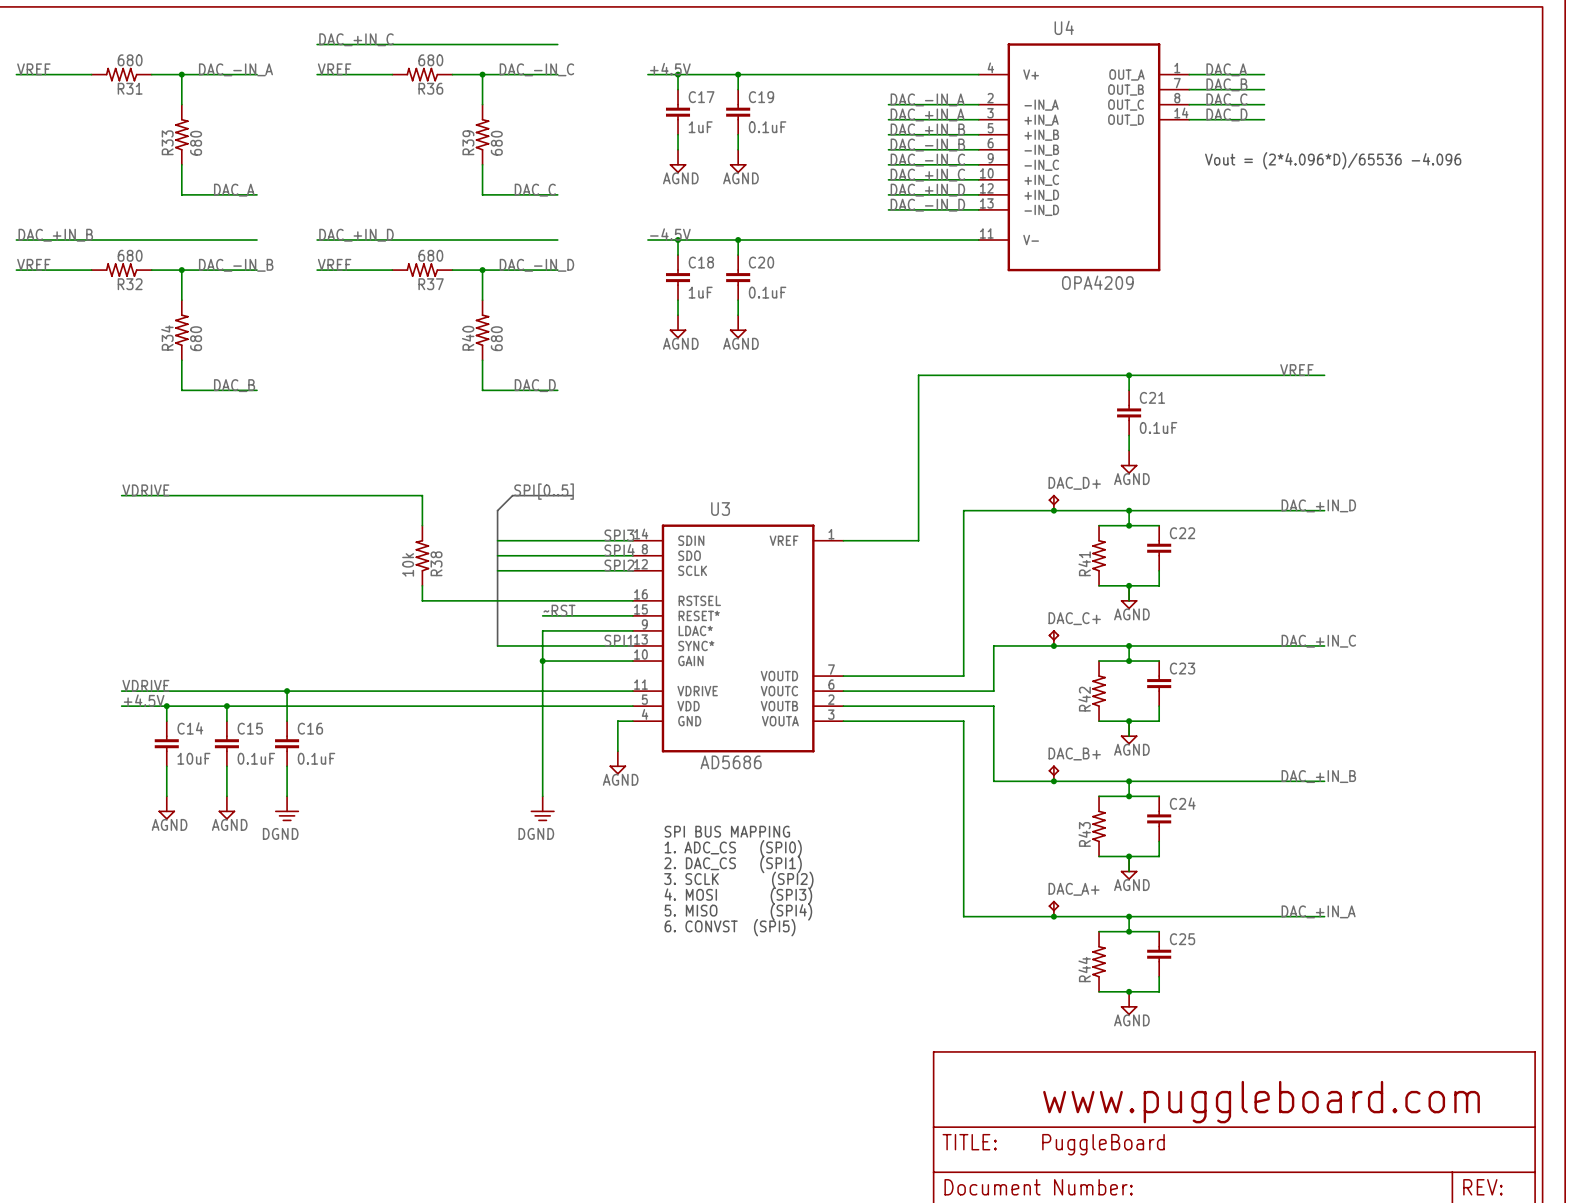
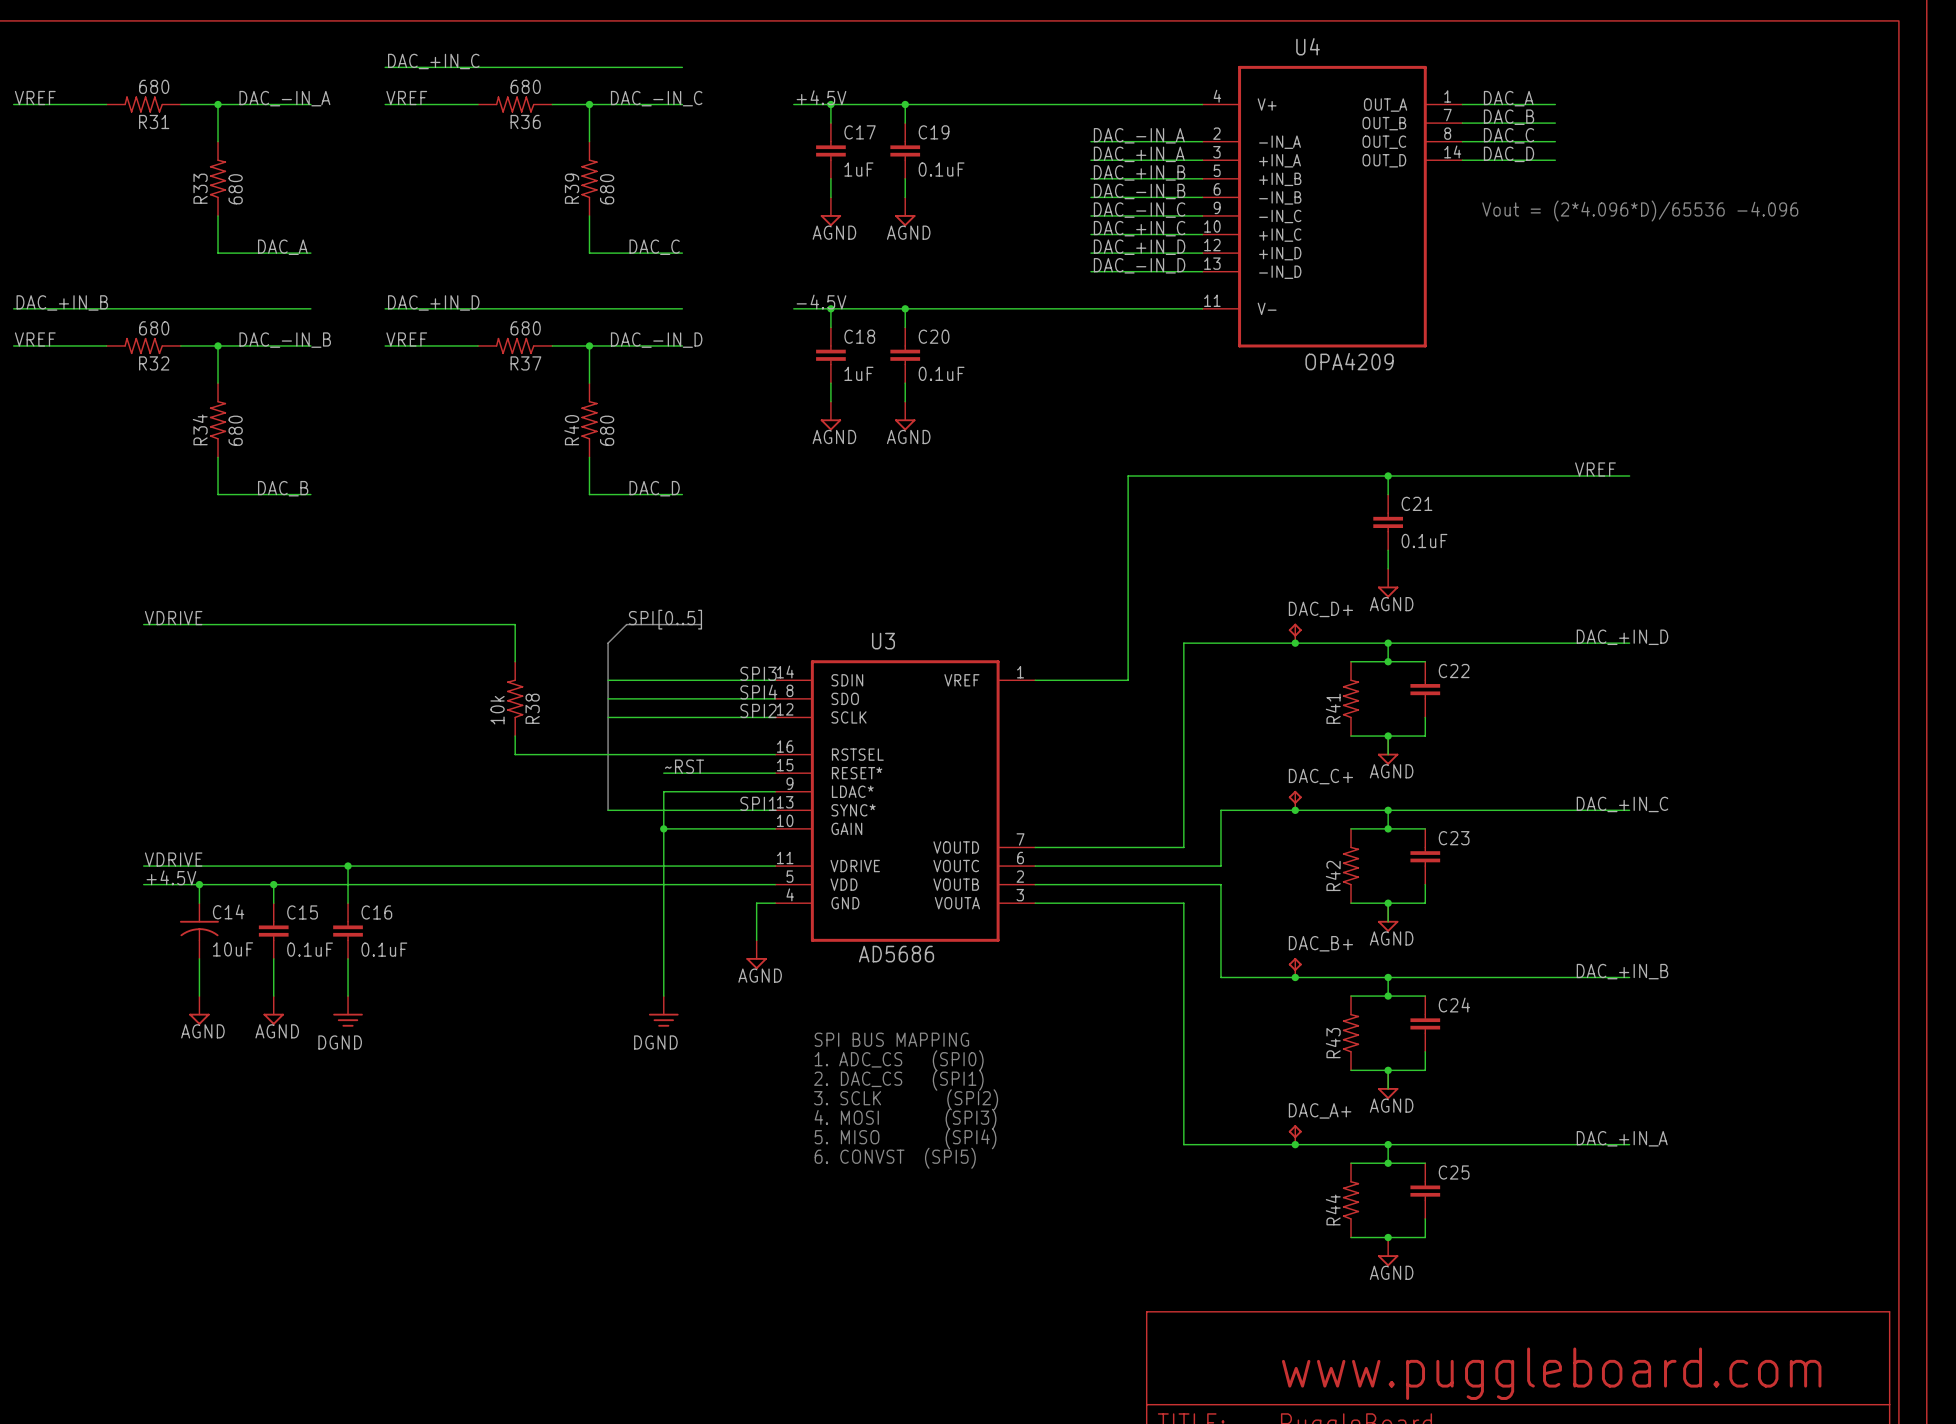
C14 symbol: [154, 721, 179, 767] -> [179, 903, 219, 959]

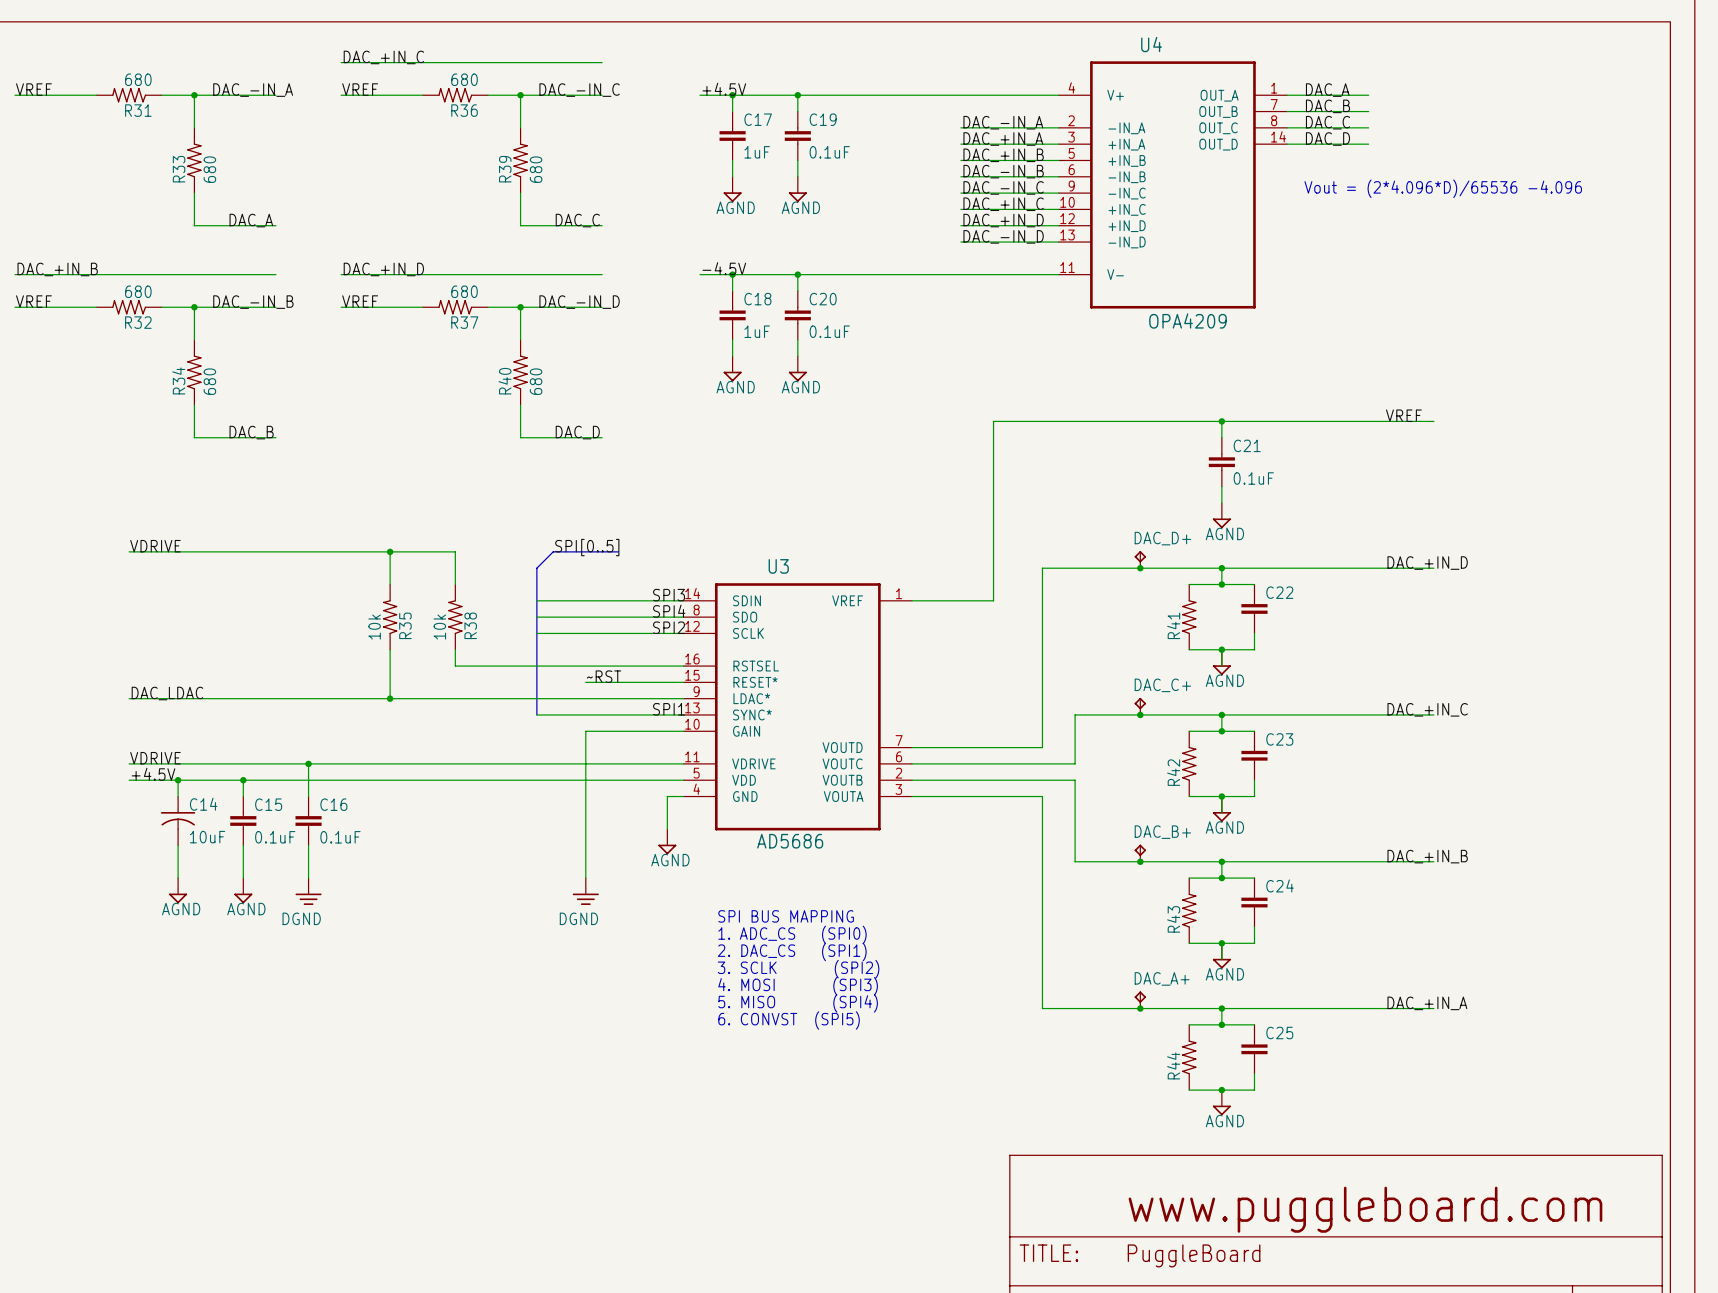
wire: none -> (390, 551) (390, 584)
junction: none -> (390, 551)
R35: none -> 10k (390, 617)
wire: none -> (390, 649) (390, 698)
label: none -> DAC_LDAC (167, 693)
junction: none -> (390, 698)
wire: (663, 791) (663, 828) -> (585, 698) (129, 698)
junction: (663, 828) -> none

